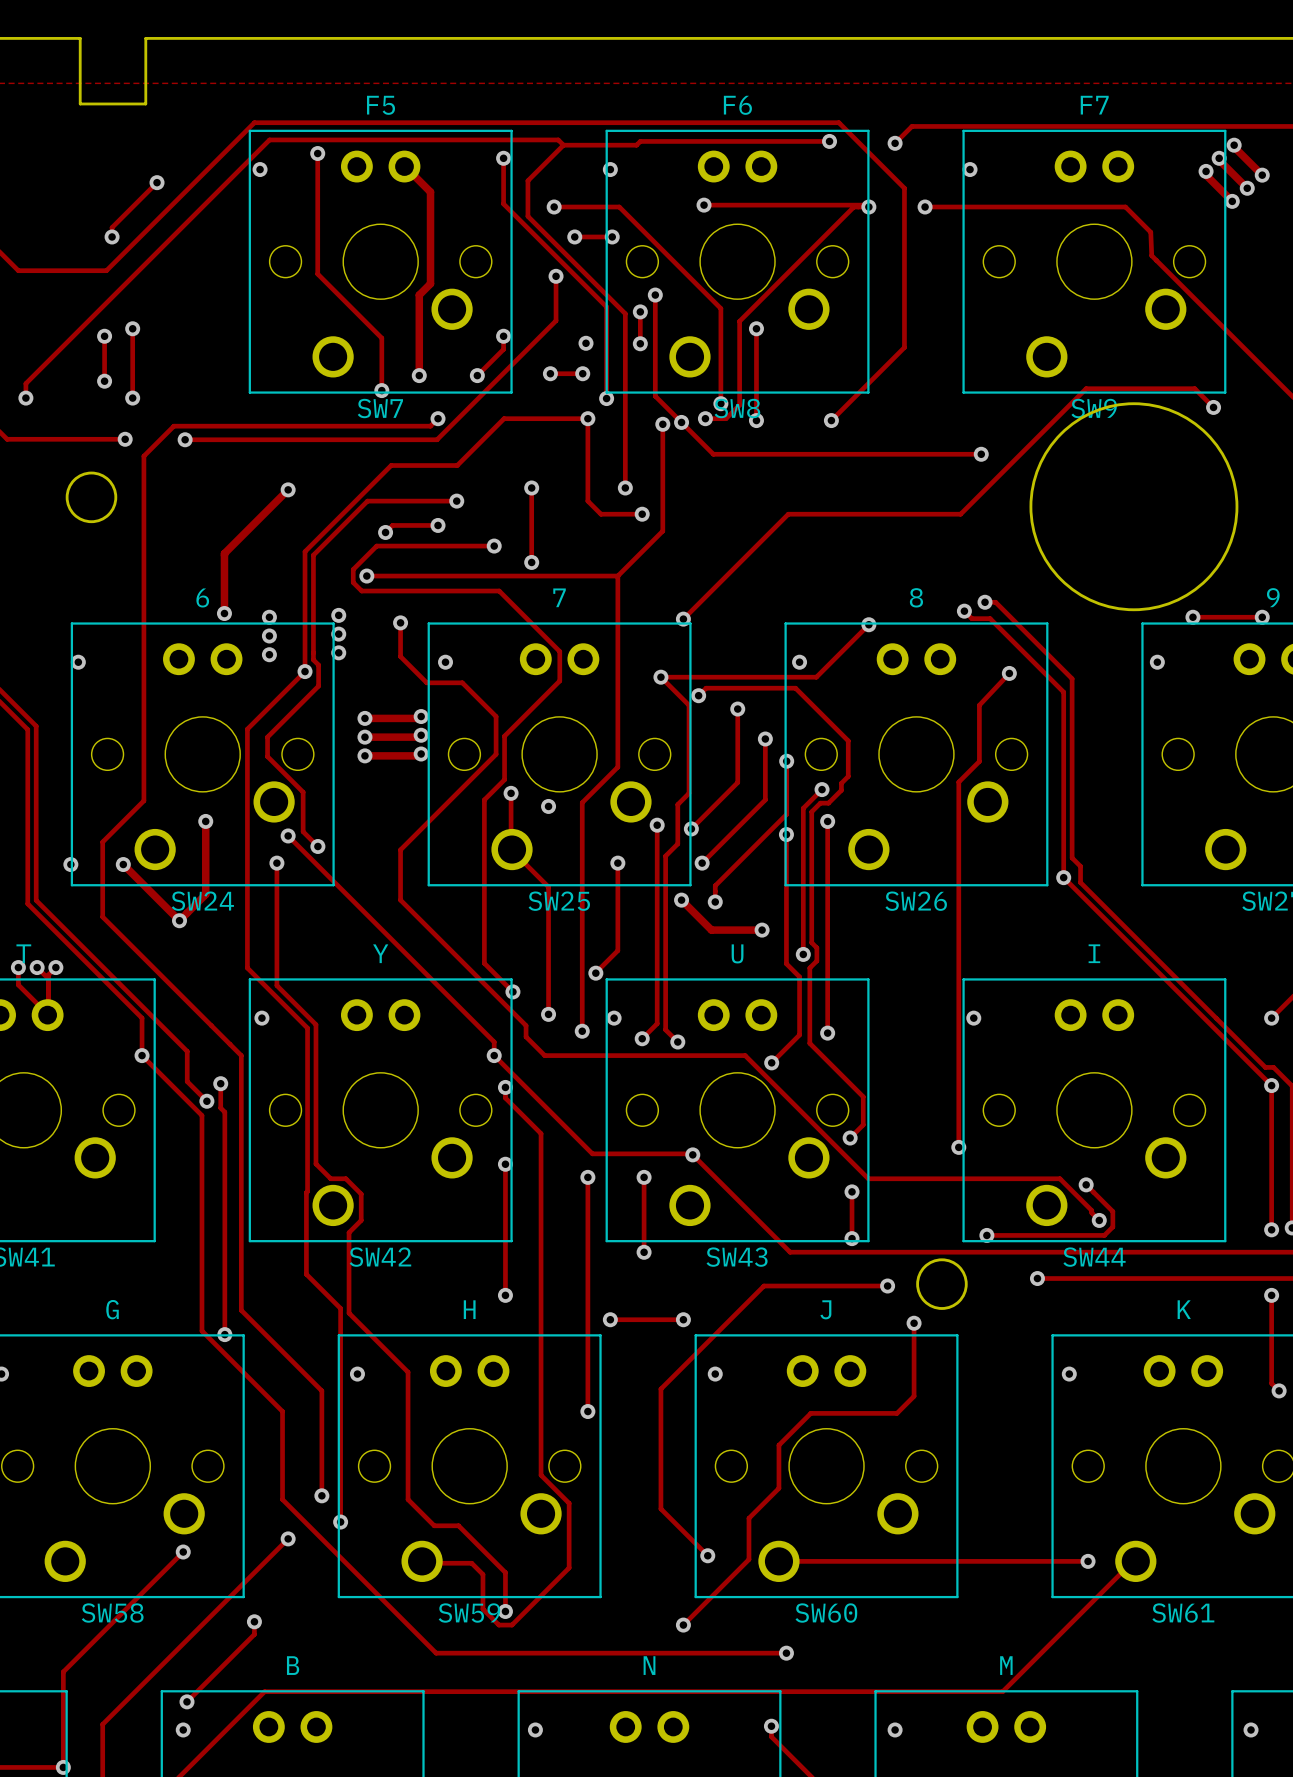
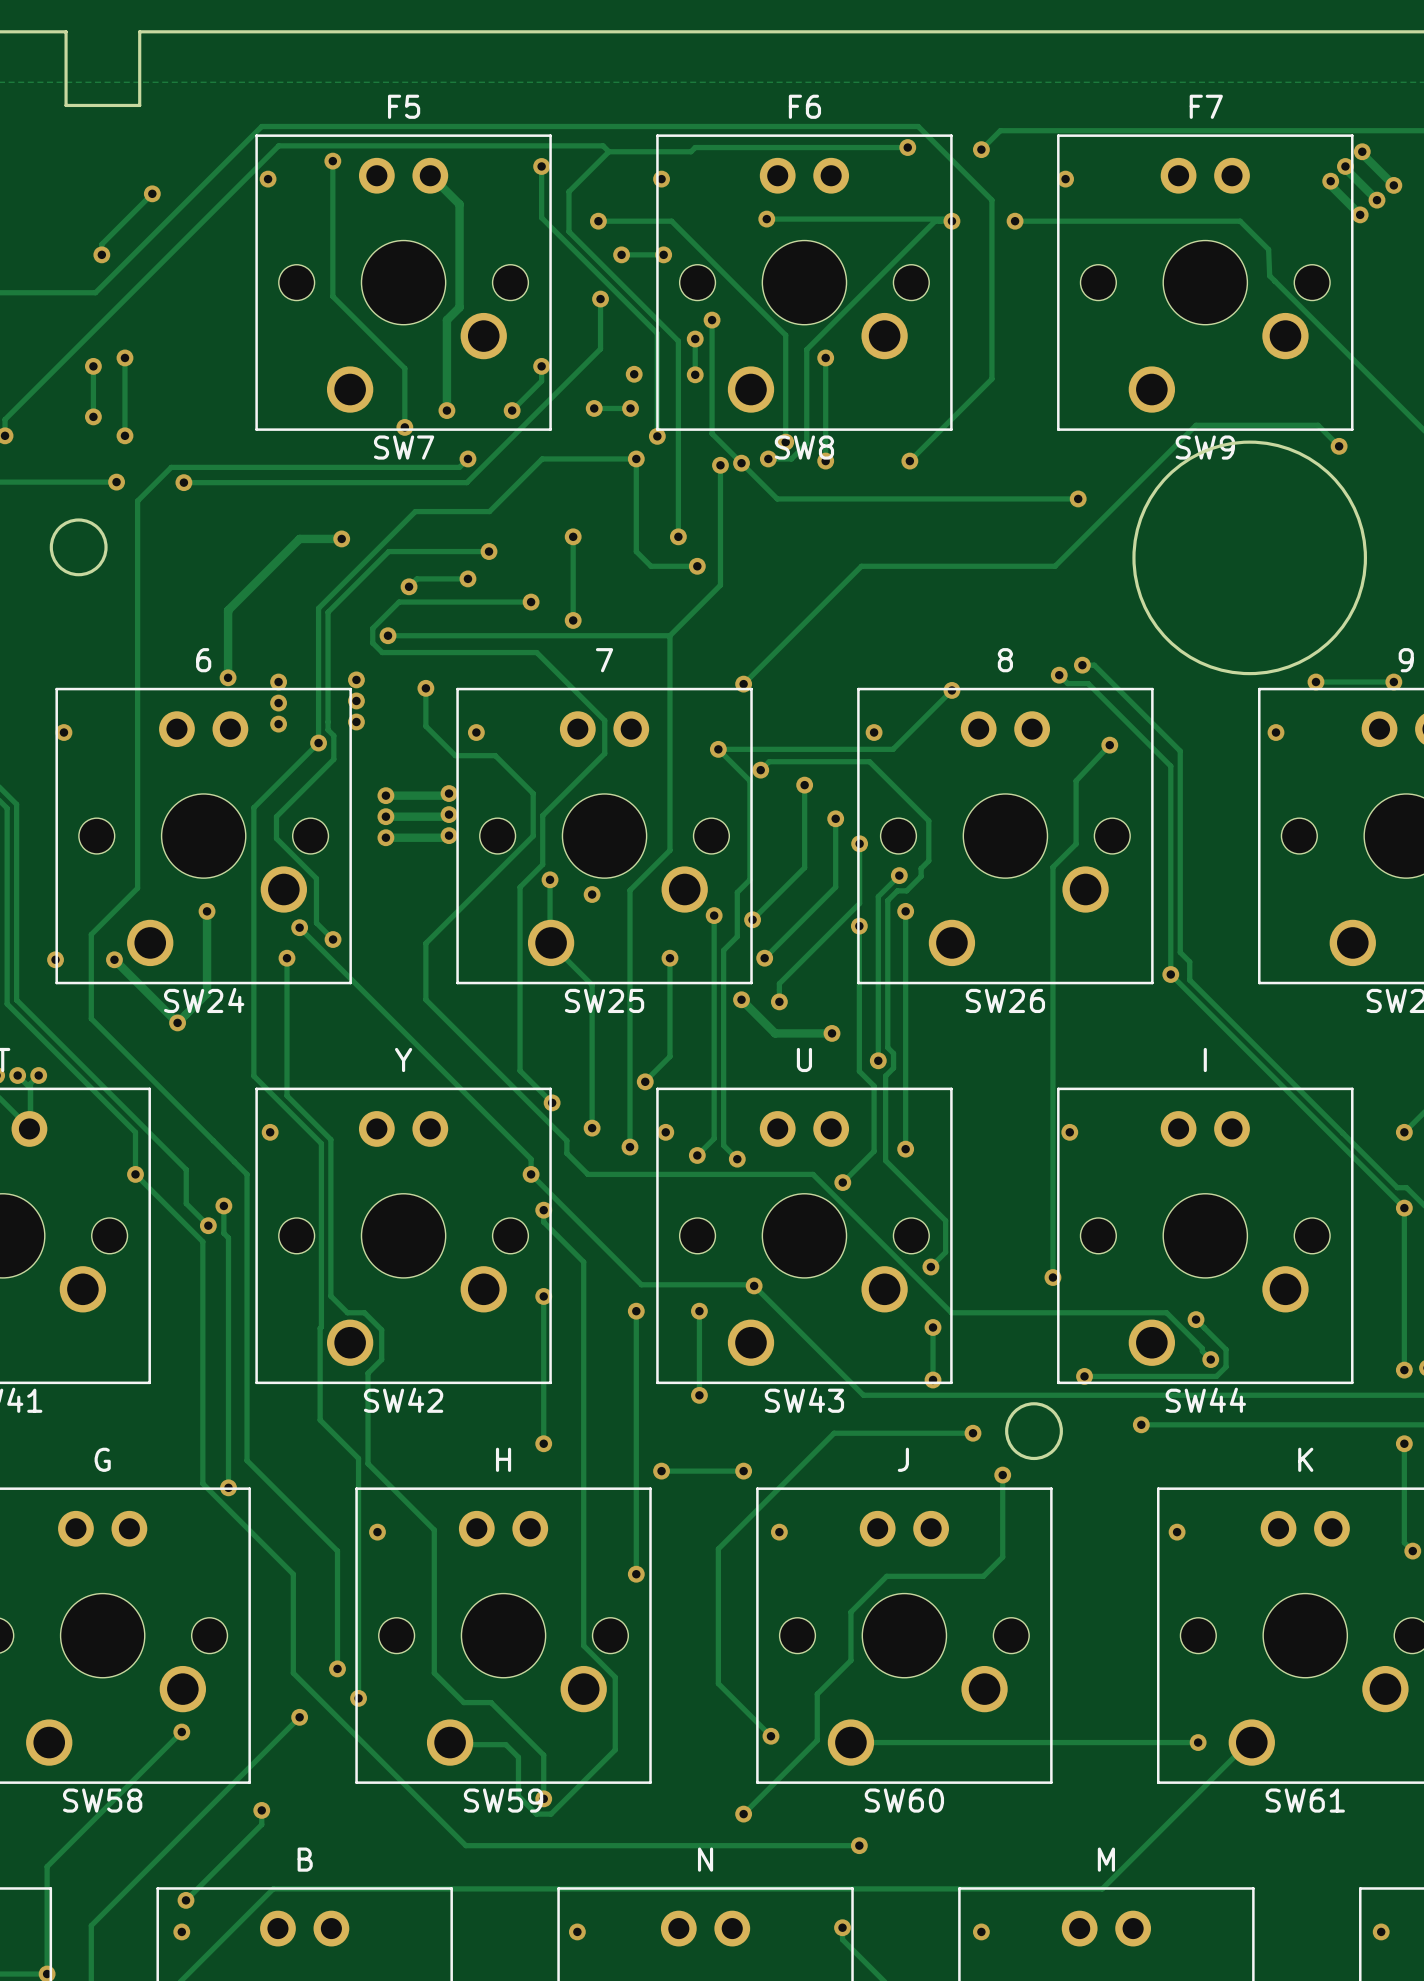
track: none -> (299, 538) (341, 538)
via position: (288, 489) -> (341, 538)

